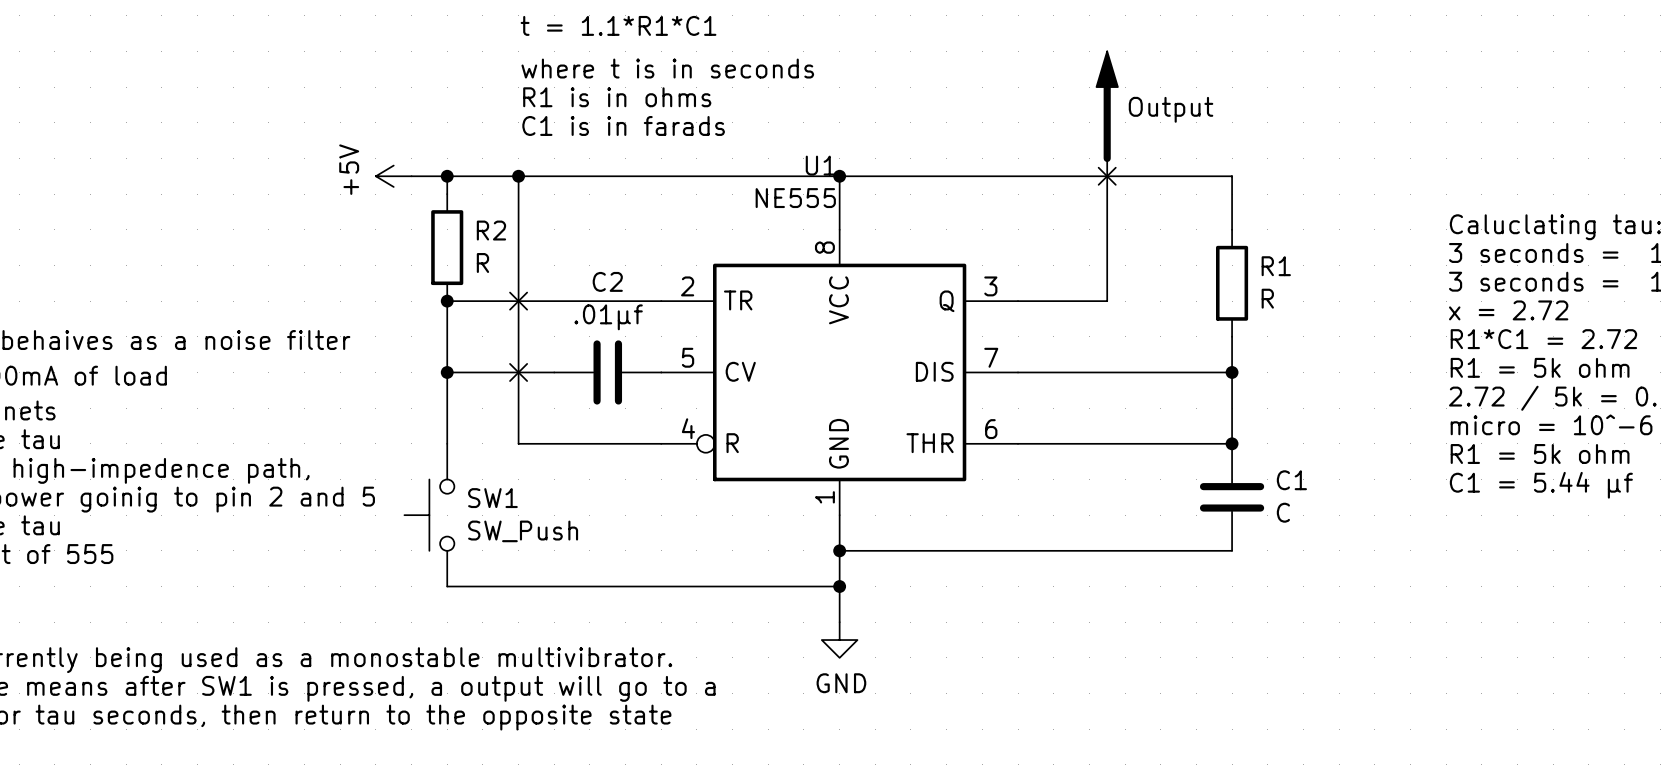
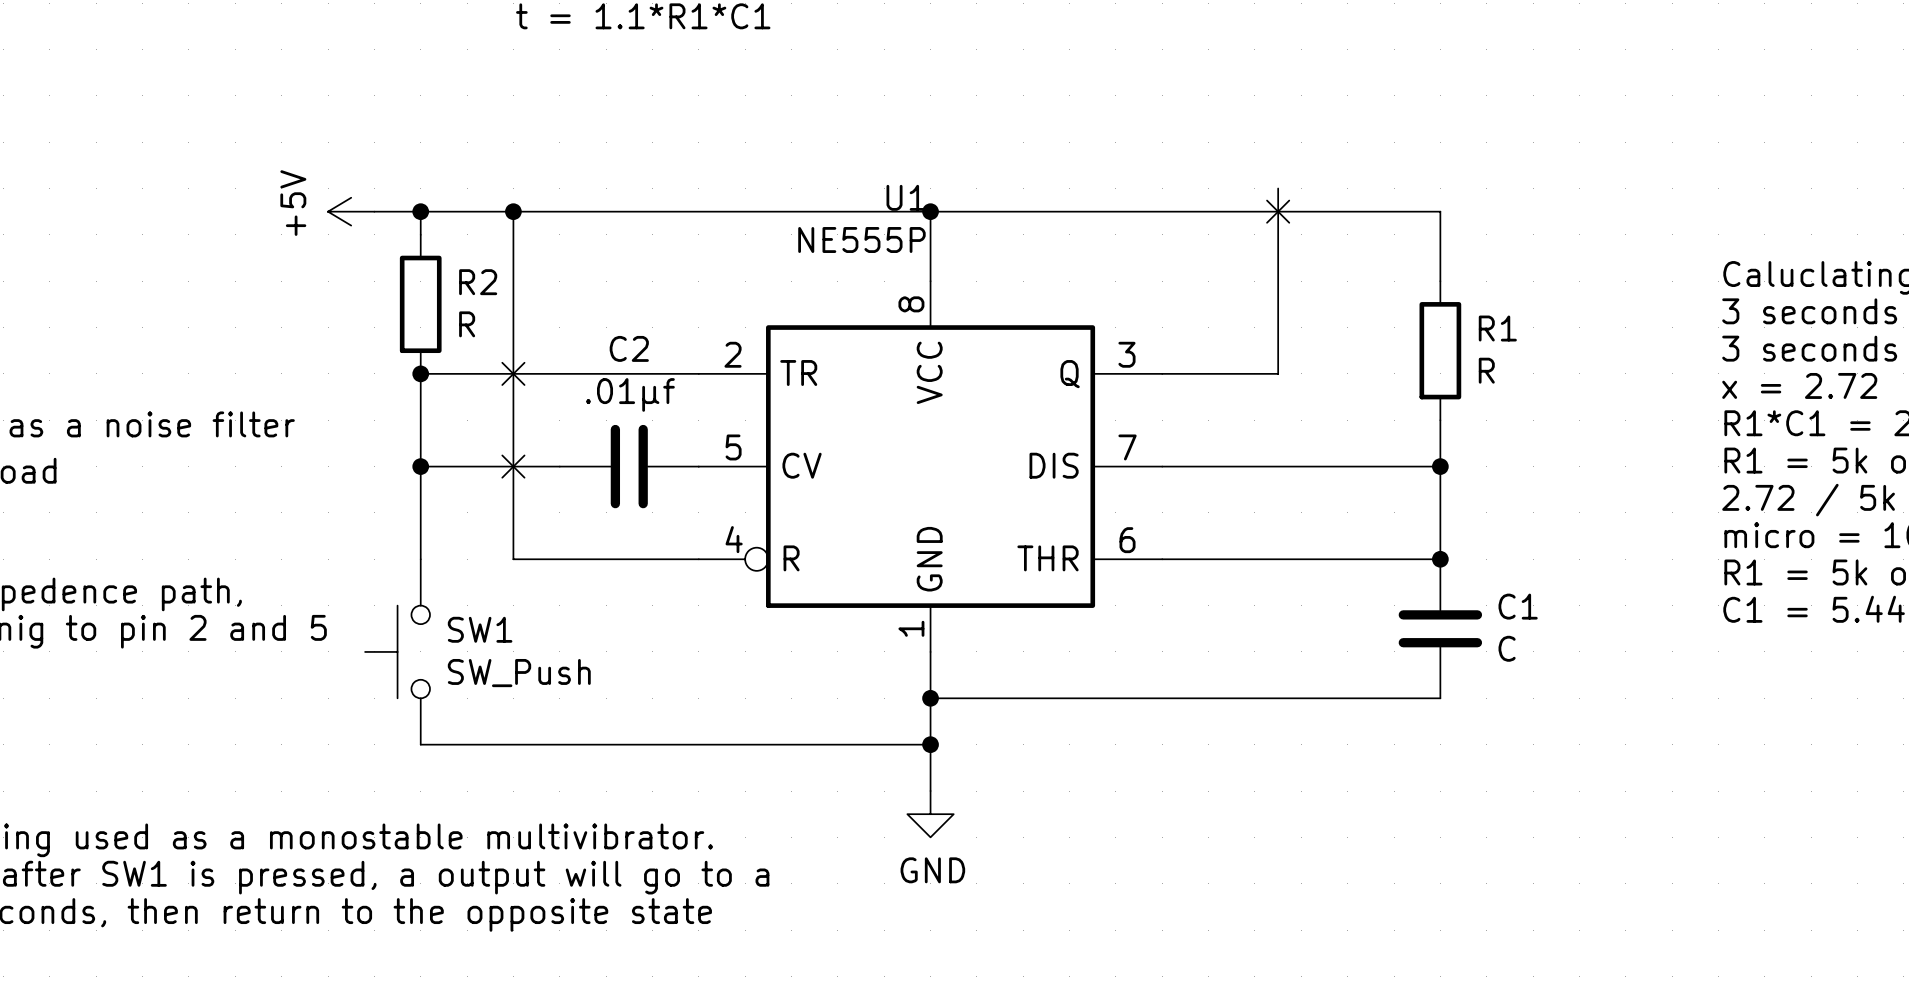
text: where t is in seconds (667, 68) -> none
text: R1 is in ohms (617, 97) -> none
power symbol: (1107, 106) -> none
label: Output (1171, 109) -> none
text: C1 is in farads (623, 125) -> none
U1 value: NE555 (795, 198) -> NE555P (861, 240)

